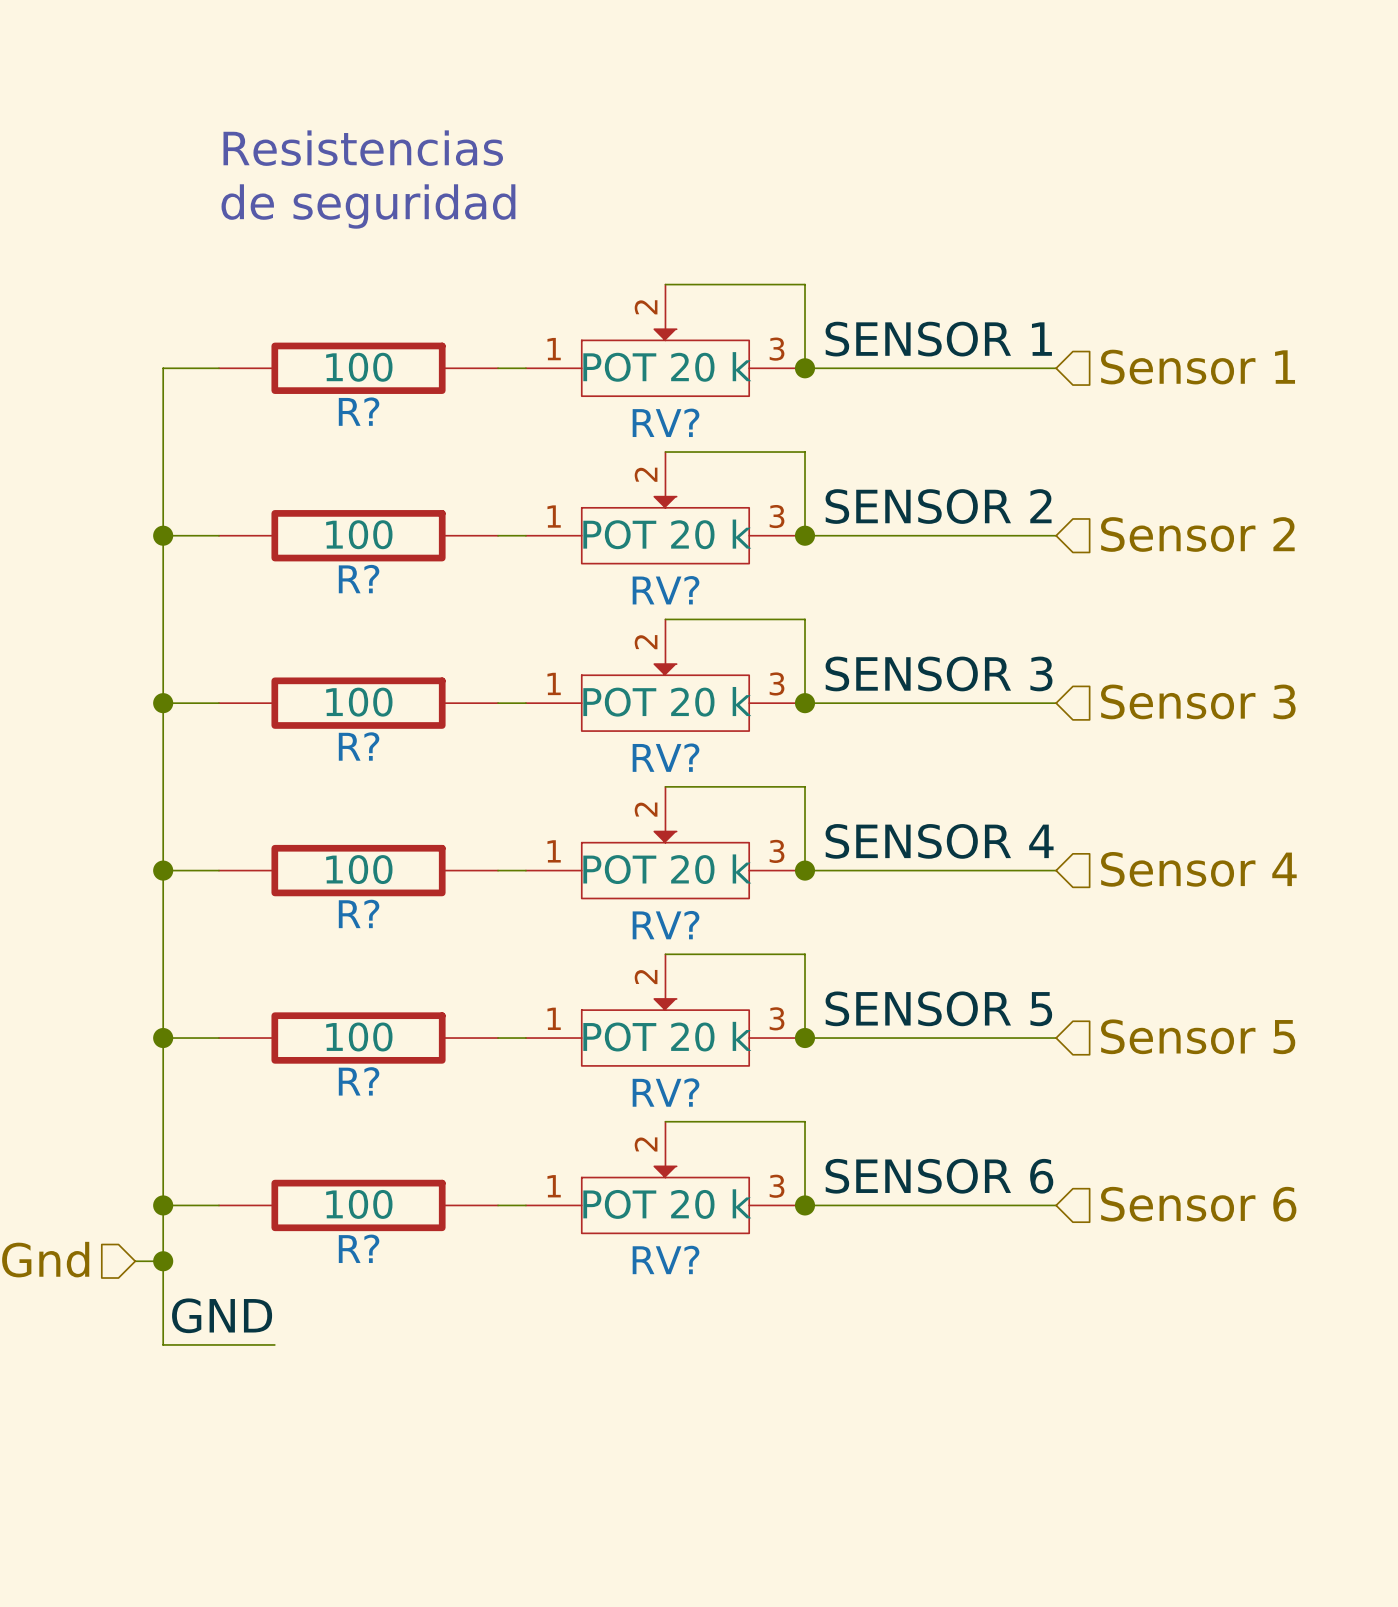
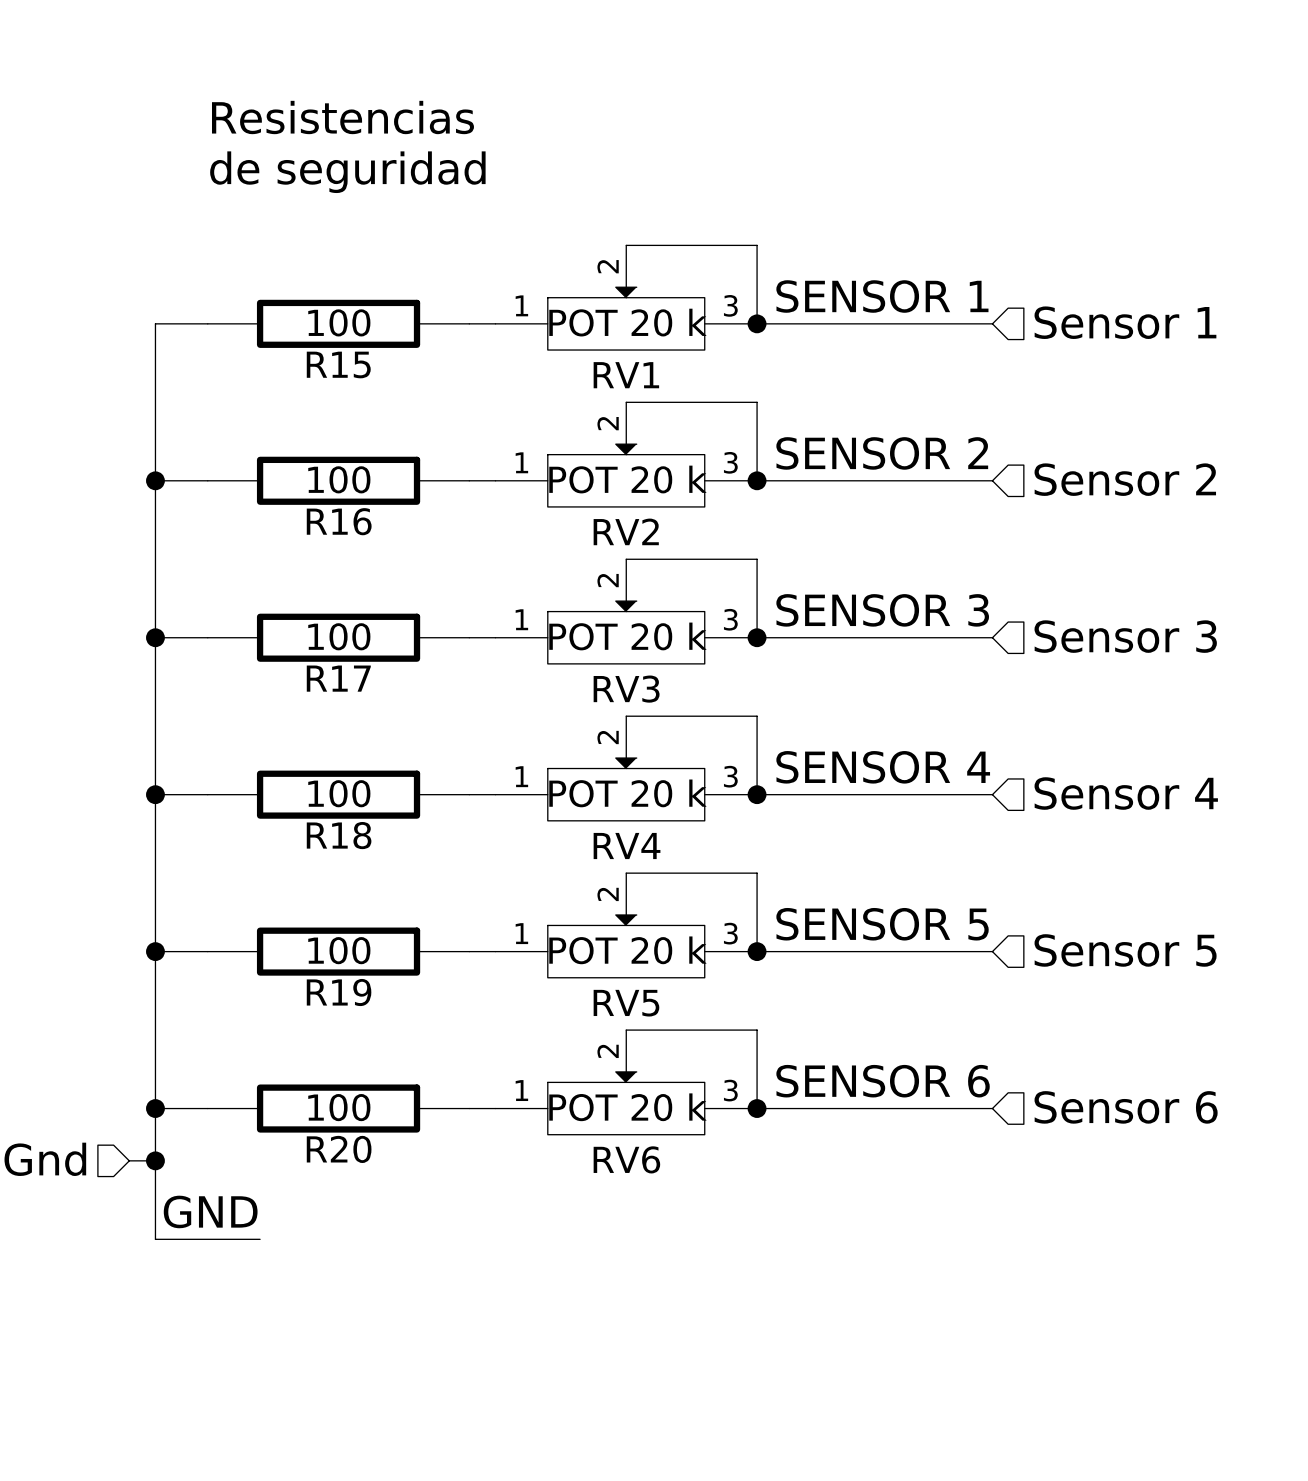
R? name: R? (359, 411) -> R15 (338, 364)
RV? name: RV? (666, 422) -> RV1 (626, 375)
R? name: R? (359, 579) -> R16 (339, 521)
RV? name: RV? (666, 590) -> RV2 (626, 531)
R? name: R? (359, 746) -> R17 (338, 678)
RV? name: RV? (666, 757) -> RV3 (626, 689)
R? name: R? (359, 913) -> R18 (339, 835)
RV? name: RV? (666, 925) -> RV4 (627, 846)
R? name: R? (359, 1081) -> R19 (339, 992)
RV? name: RV? (666, 1092) -> RV5 (626, 1003)
R? name: R? (359, 1248) -> R20 (339, 1149)
RV? name: RV? (666, 1259) -> RV6 (626, 1159)

